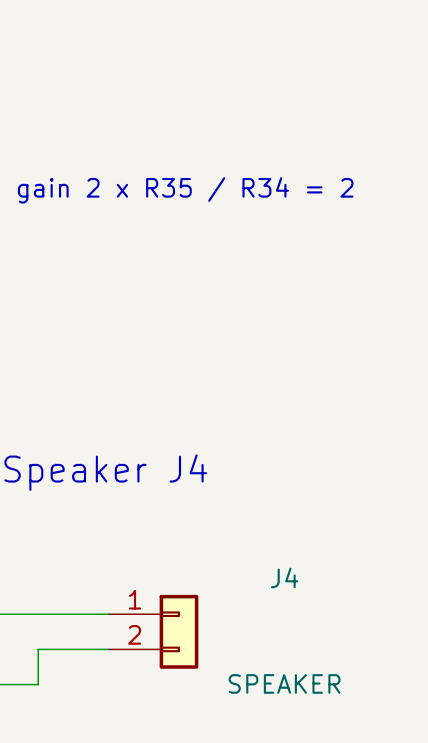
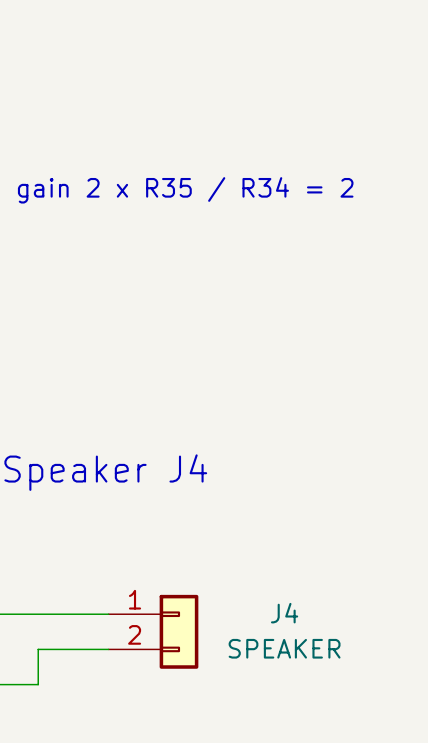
J4 name position: J4 (284, 577) -> J4 (284, 613)
J4 value position: SPEAKER (284, 683) -> SPEAKER (284, 648)

